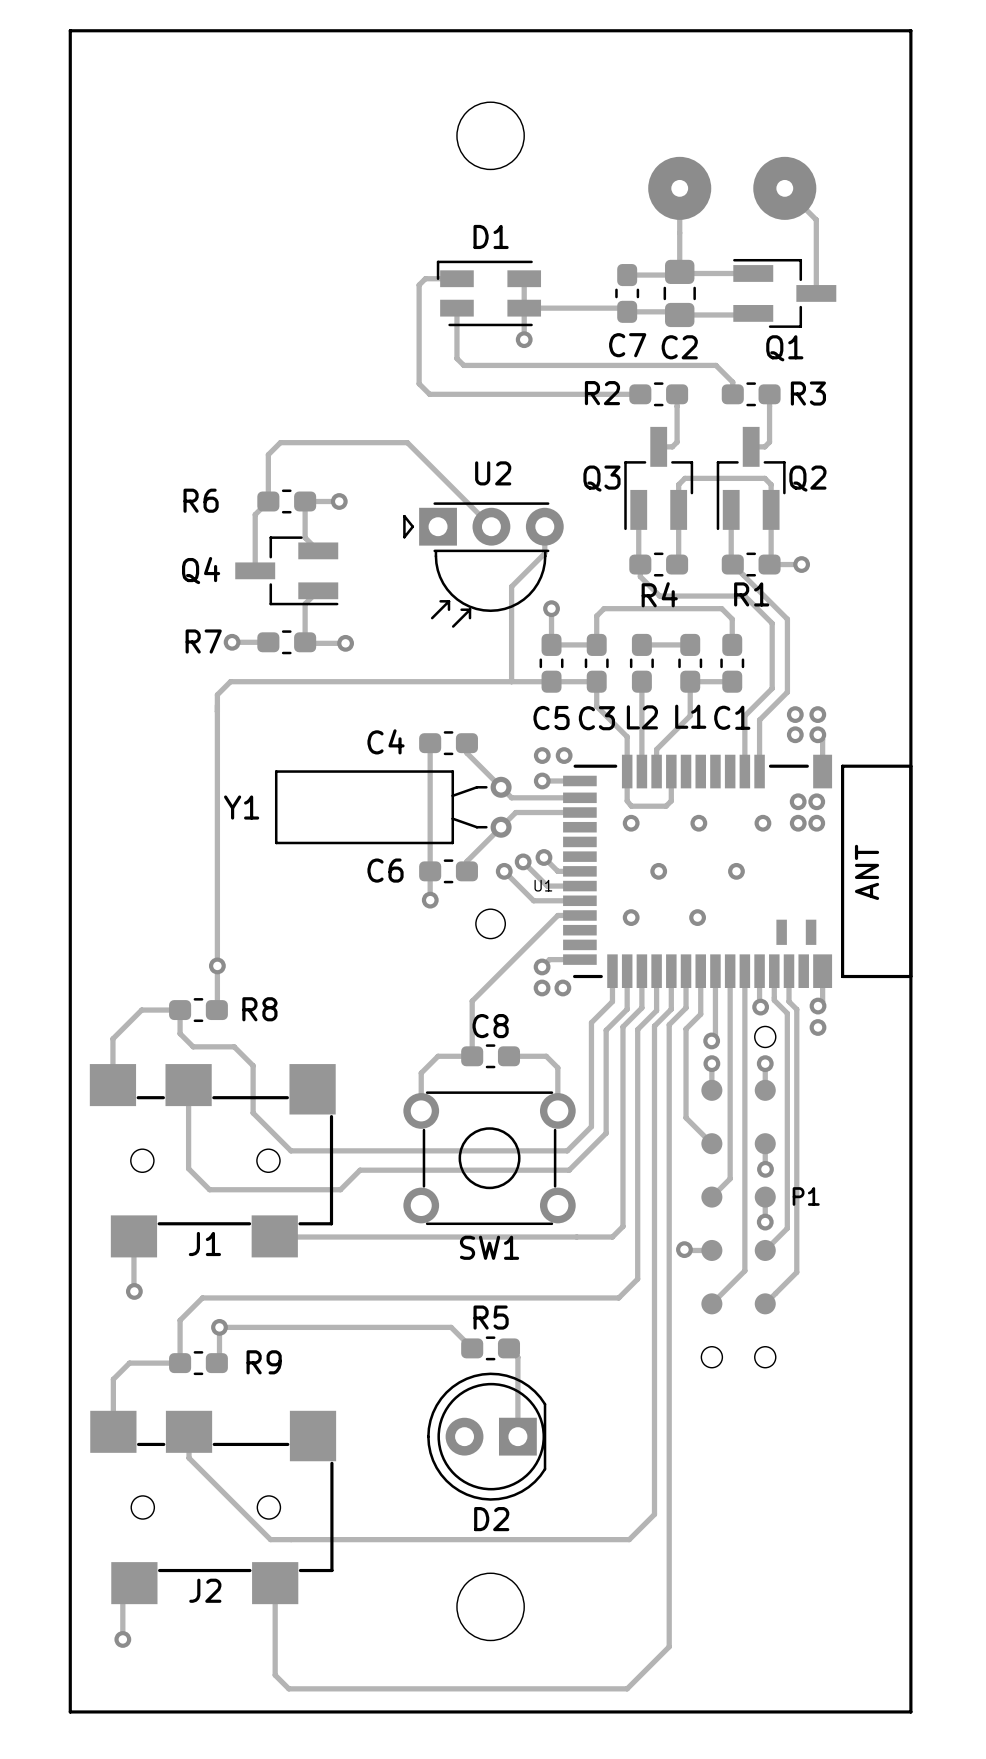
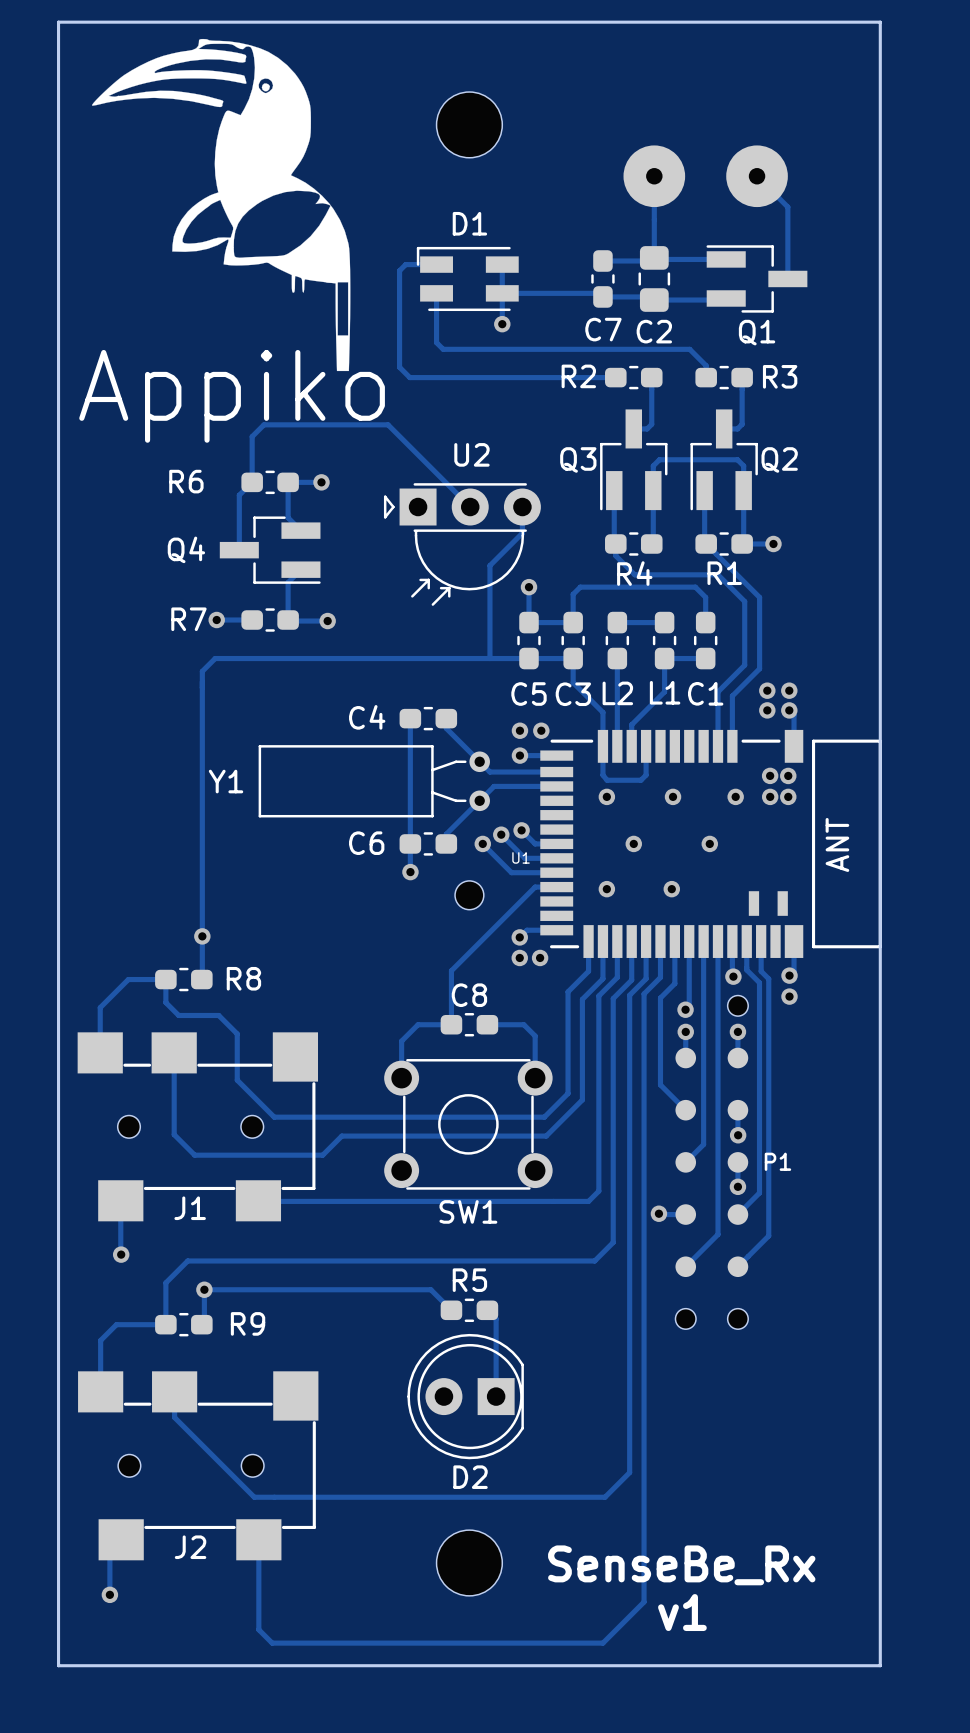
drawing: none -> [92, 38, 351, 372]
text: none -> SenseBe_Rx (681, 1565)
text: none -> v1 (682, 1612)

